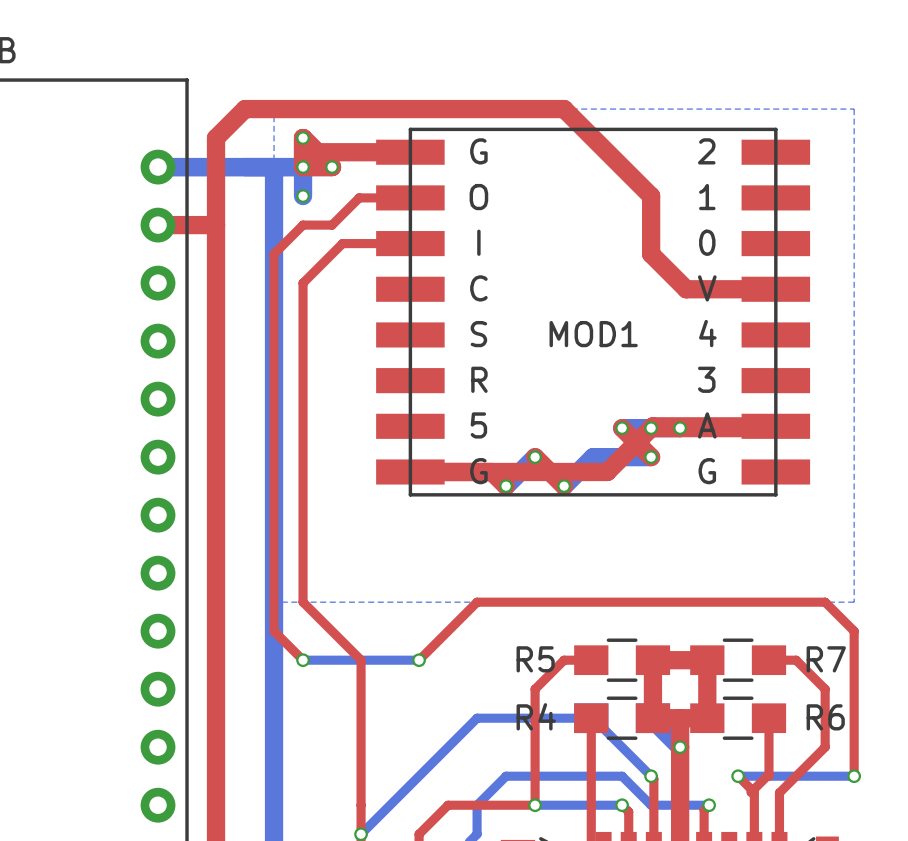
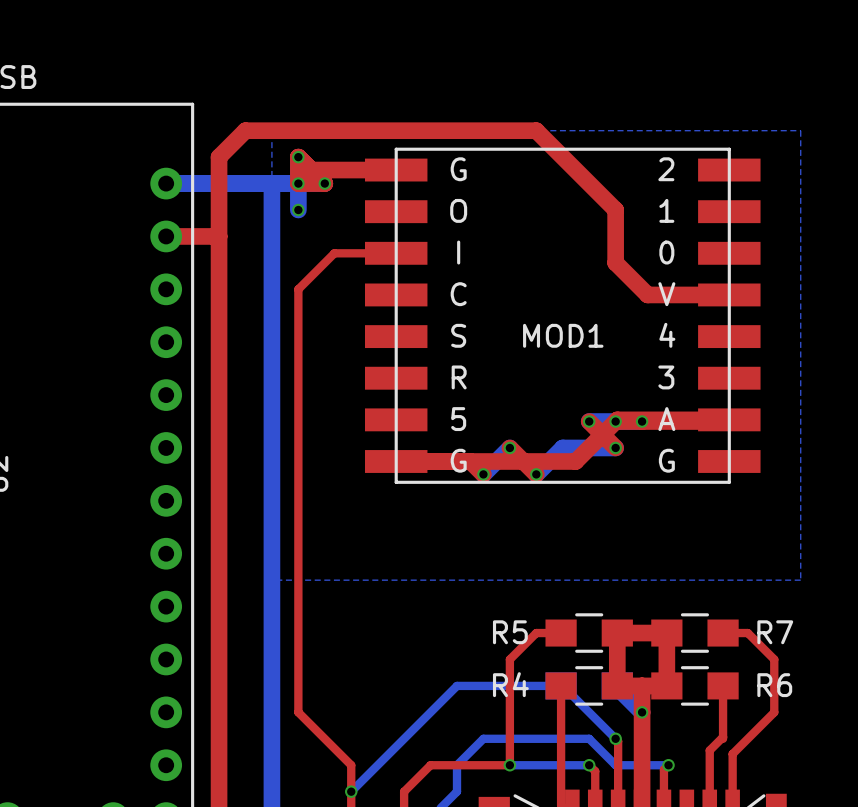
top track: (410, 197) (359, 197) (332, 225) (303, 225) (274, 254) (274, 631) (303, 660) -> none
top track: (303, 602) (361, 660) (361, 805) -> (298, 580) (298, 712) (351, 765)
bottom track: (303, 660) (419, 660) -> none
via: (303, 660) -> none
top track: (419, 660) (477, 602) (825, 602) (854, 631) (854, 776) -> none
via: (419, 660) -> none
bottom track: (738, 776) (854, 776) -> none
top track: (738, 776) (754, 792) (750, 792) -> none
via: (738, 776) -> none
via: (854, 776) -> none

